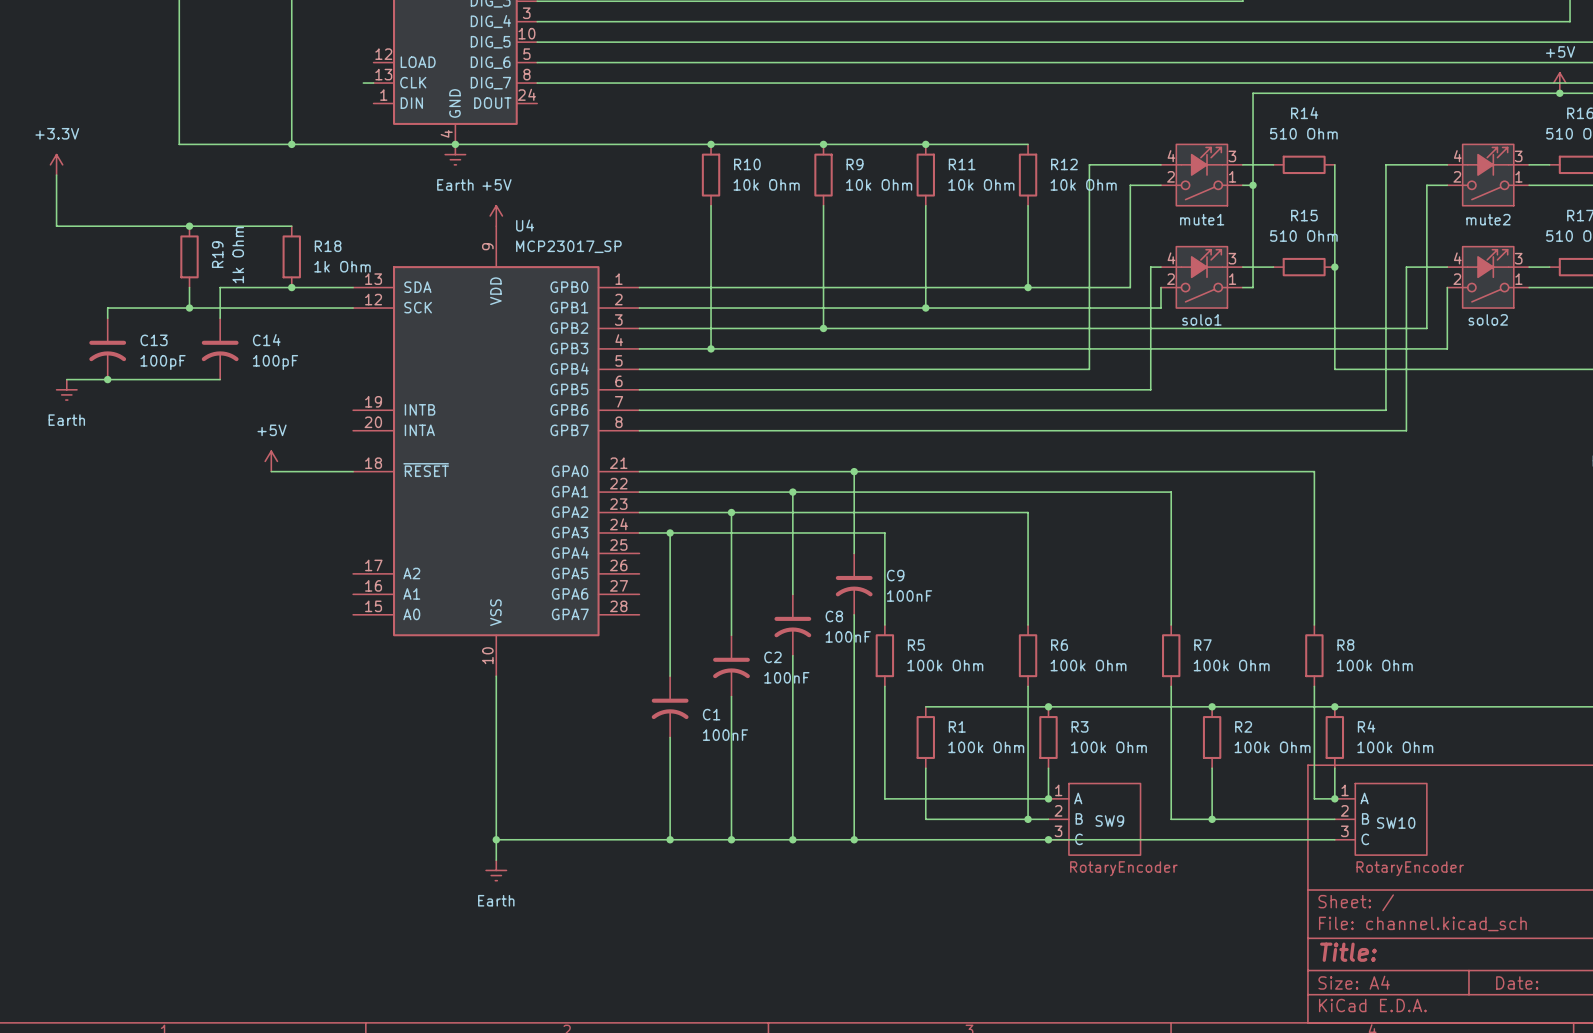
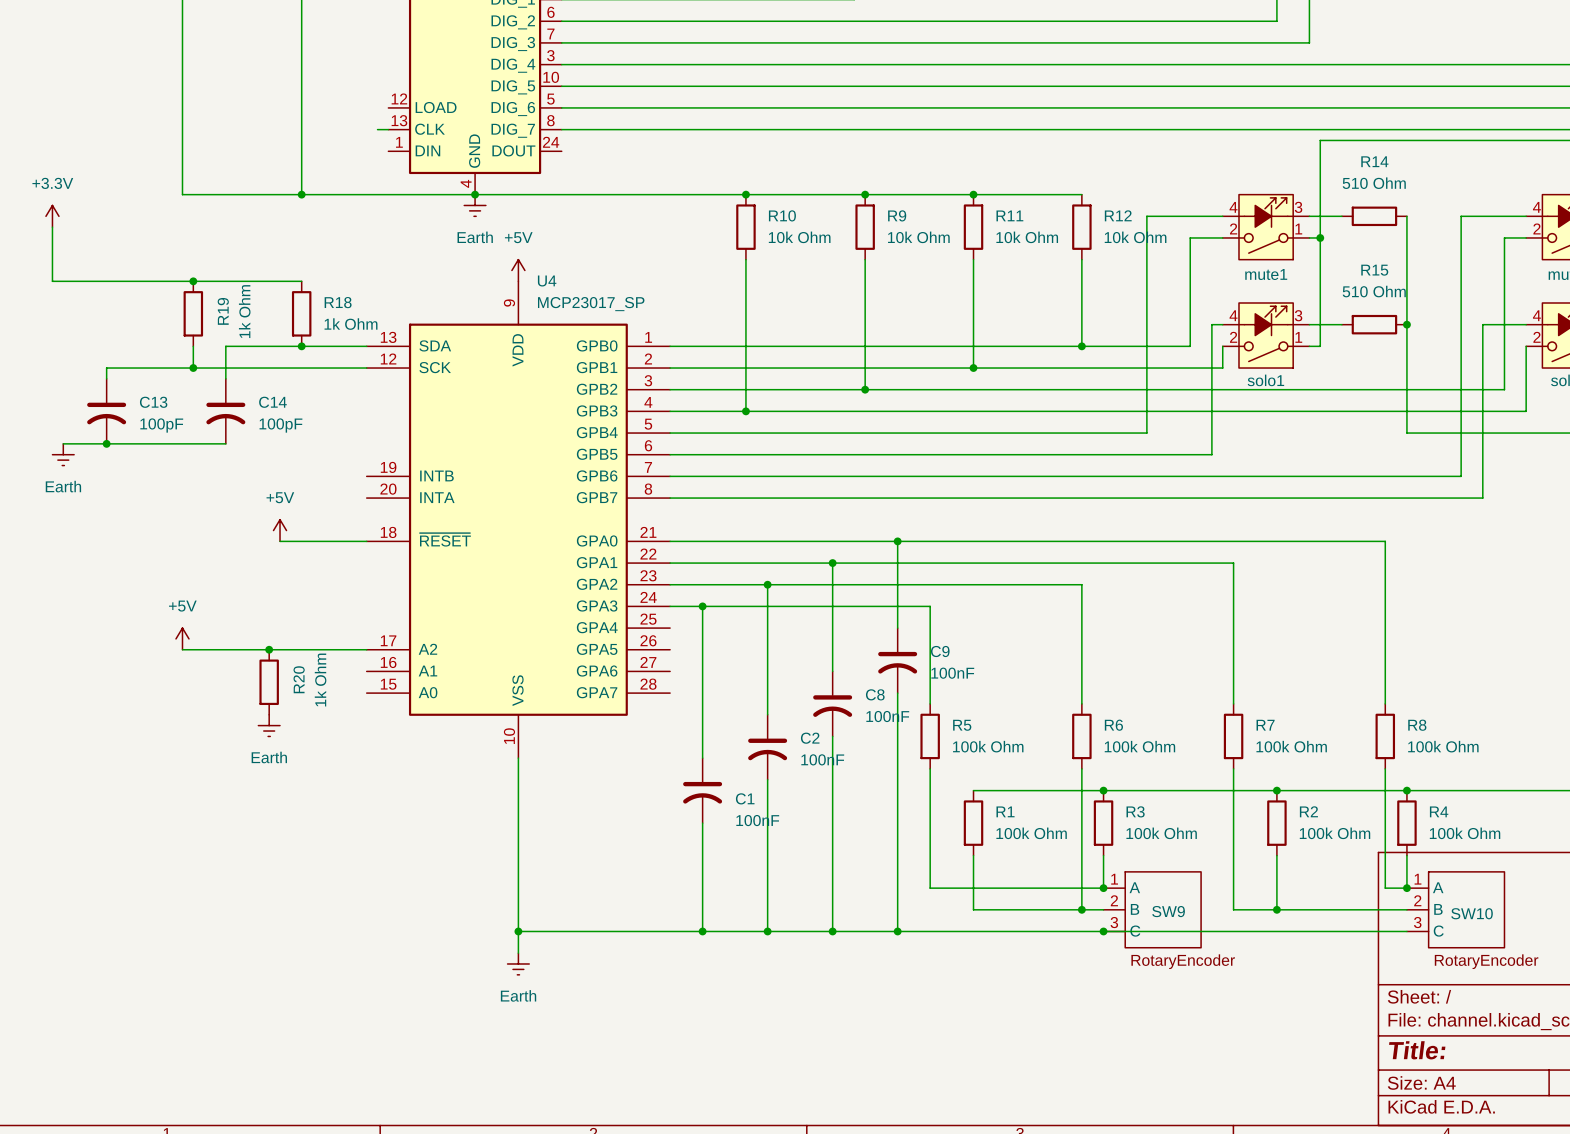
power symbol: none -> +5V (182, 638)
wire: none -> (182, 649) (366, 649)
junction: none -> (269, 649)
R20: none -> 1k Ohm (269, 682)
power symbol: none -> Earth (269, 725)

